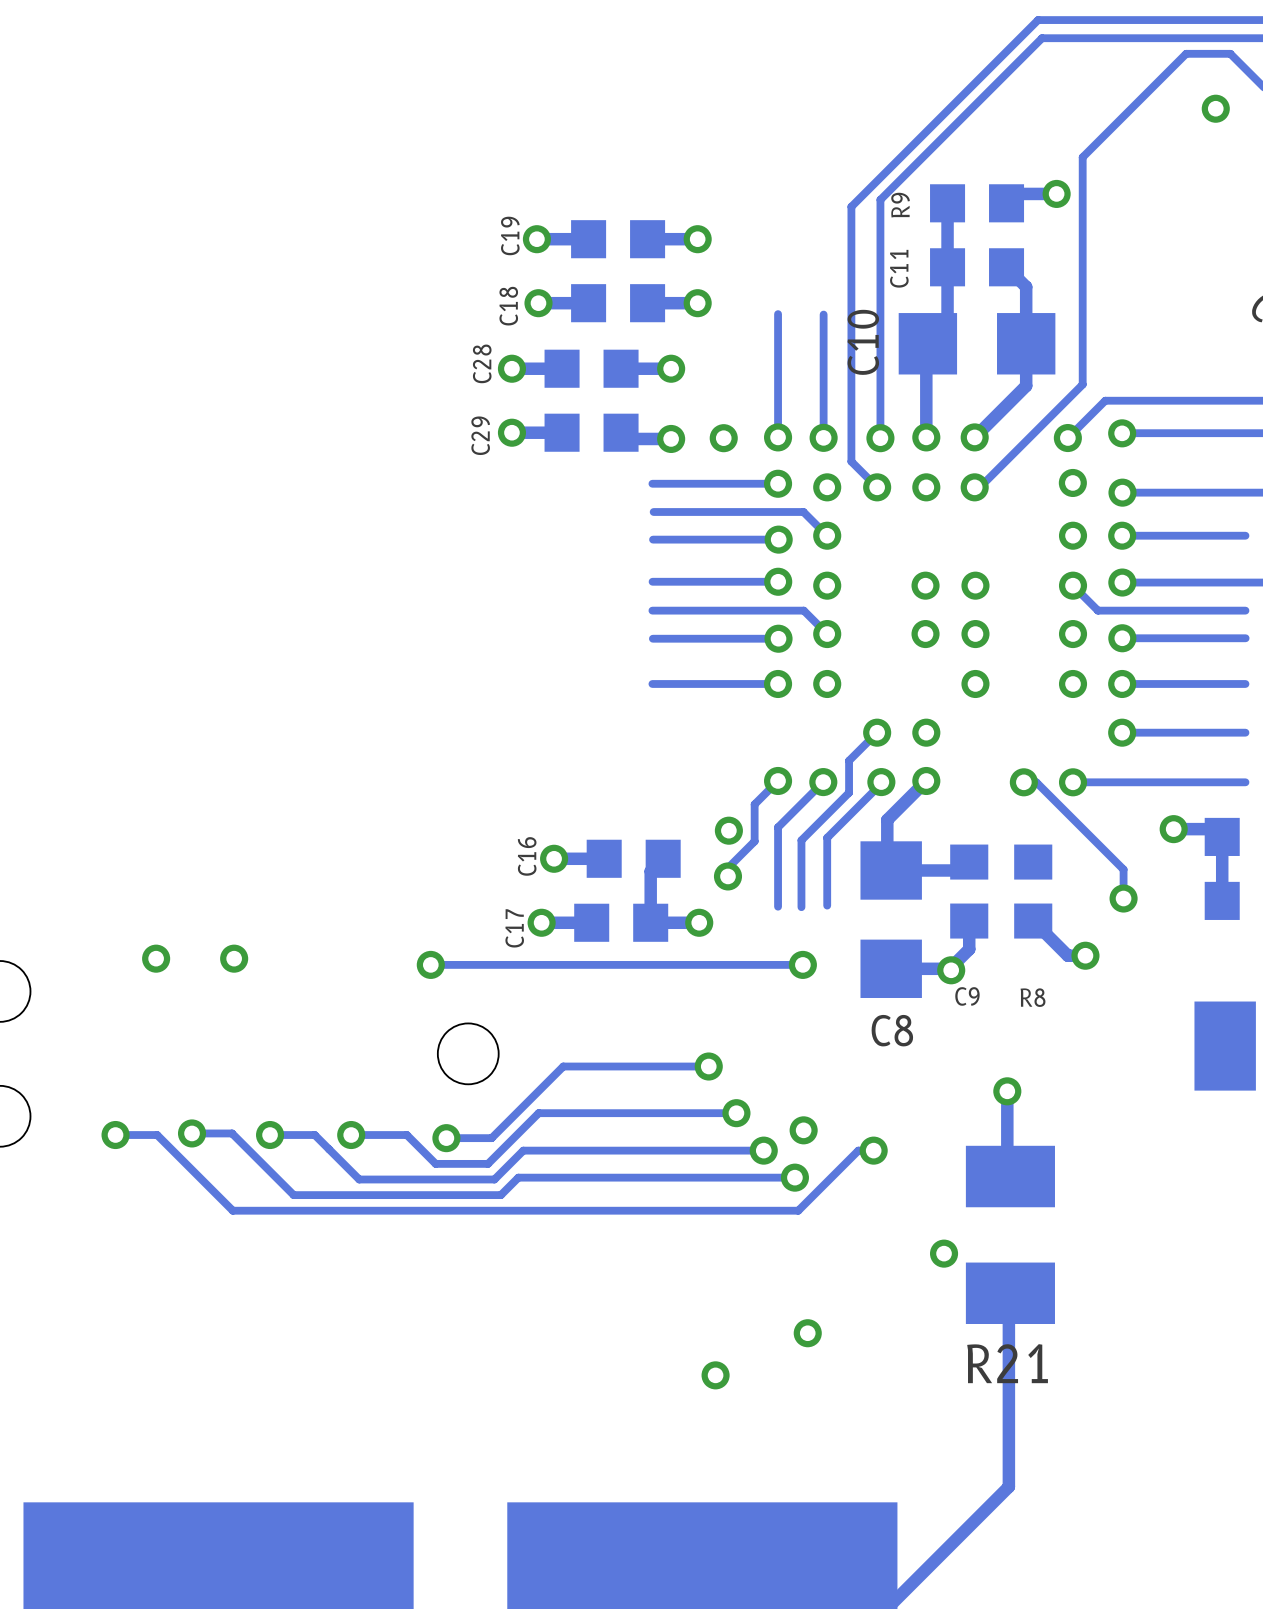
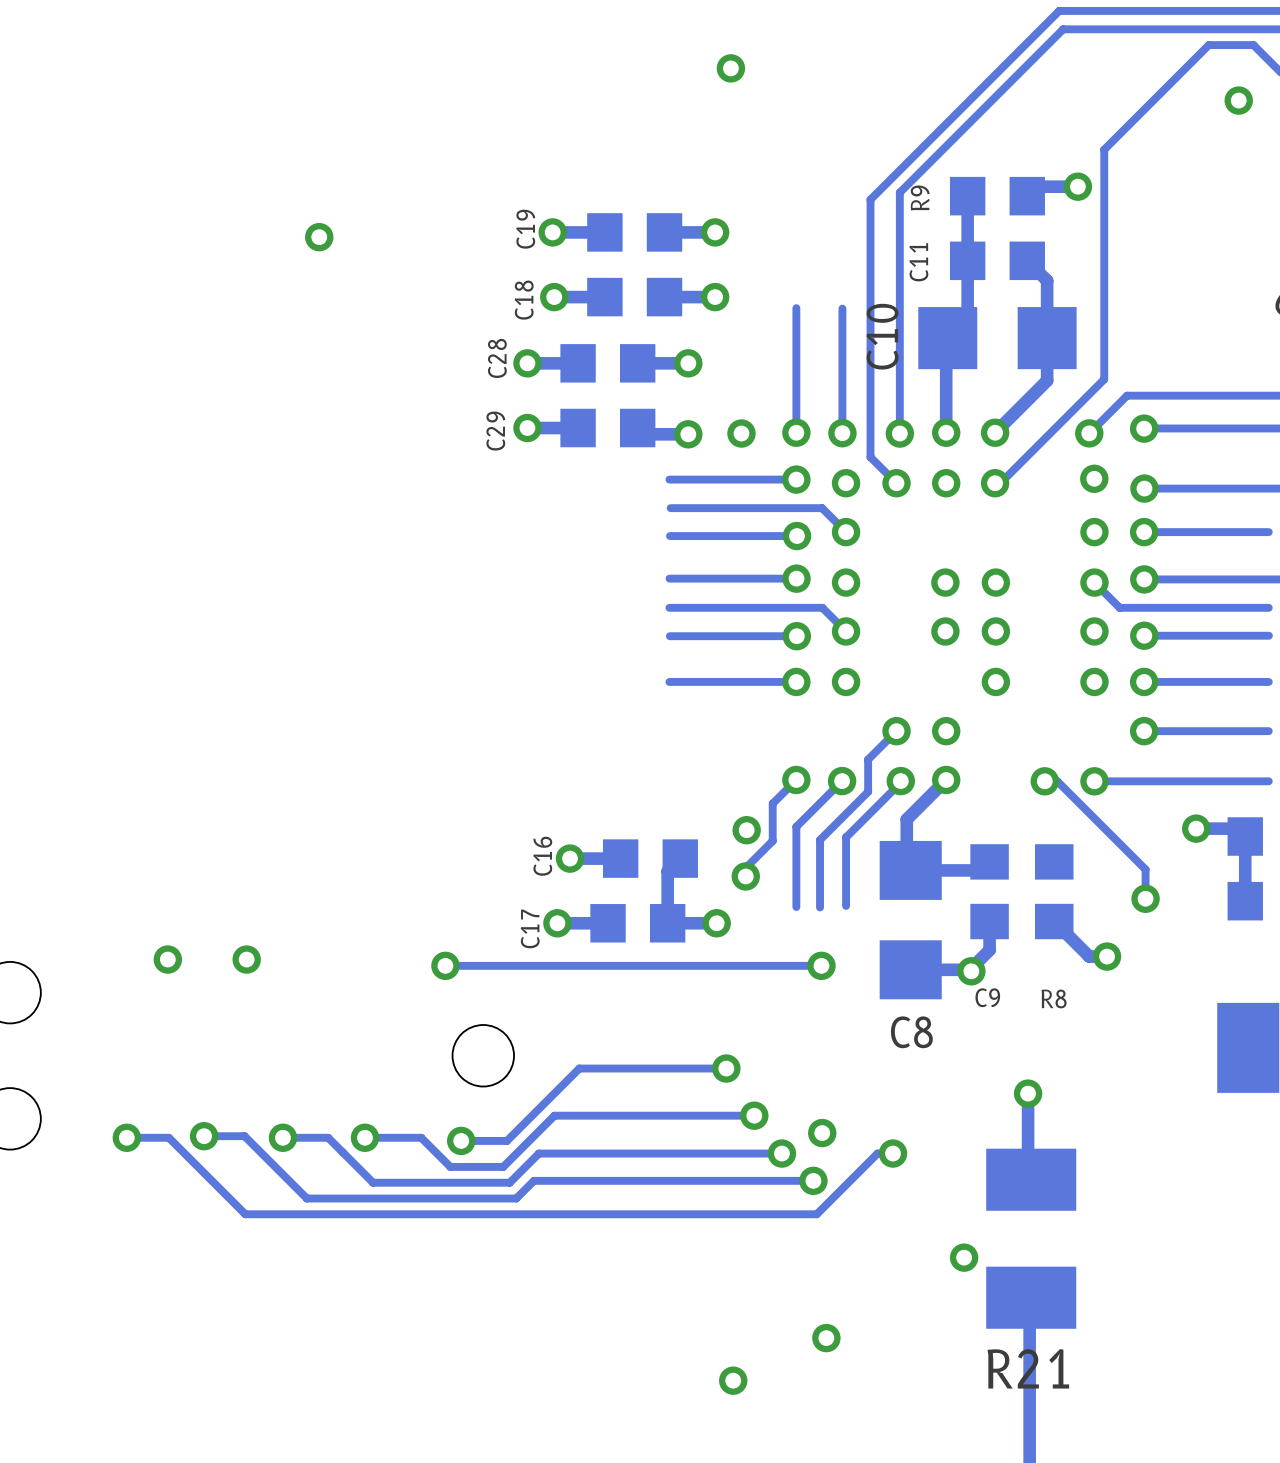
via: none -> (730, 68)
via: none -> (319, 237)

